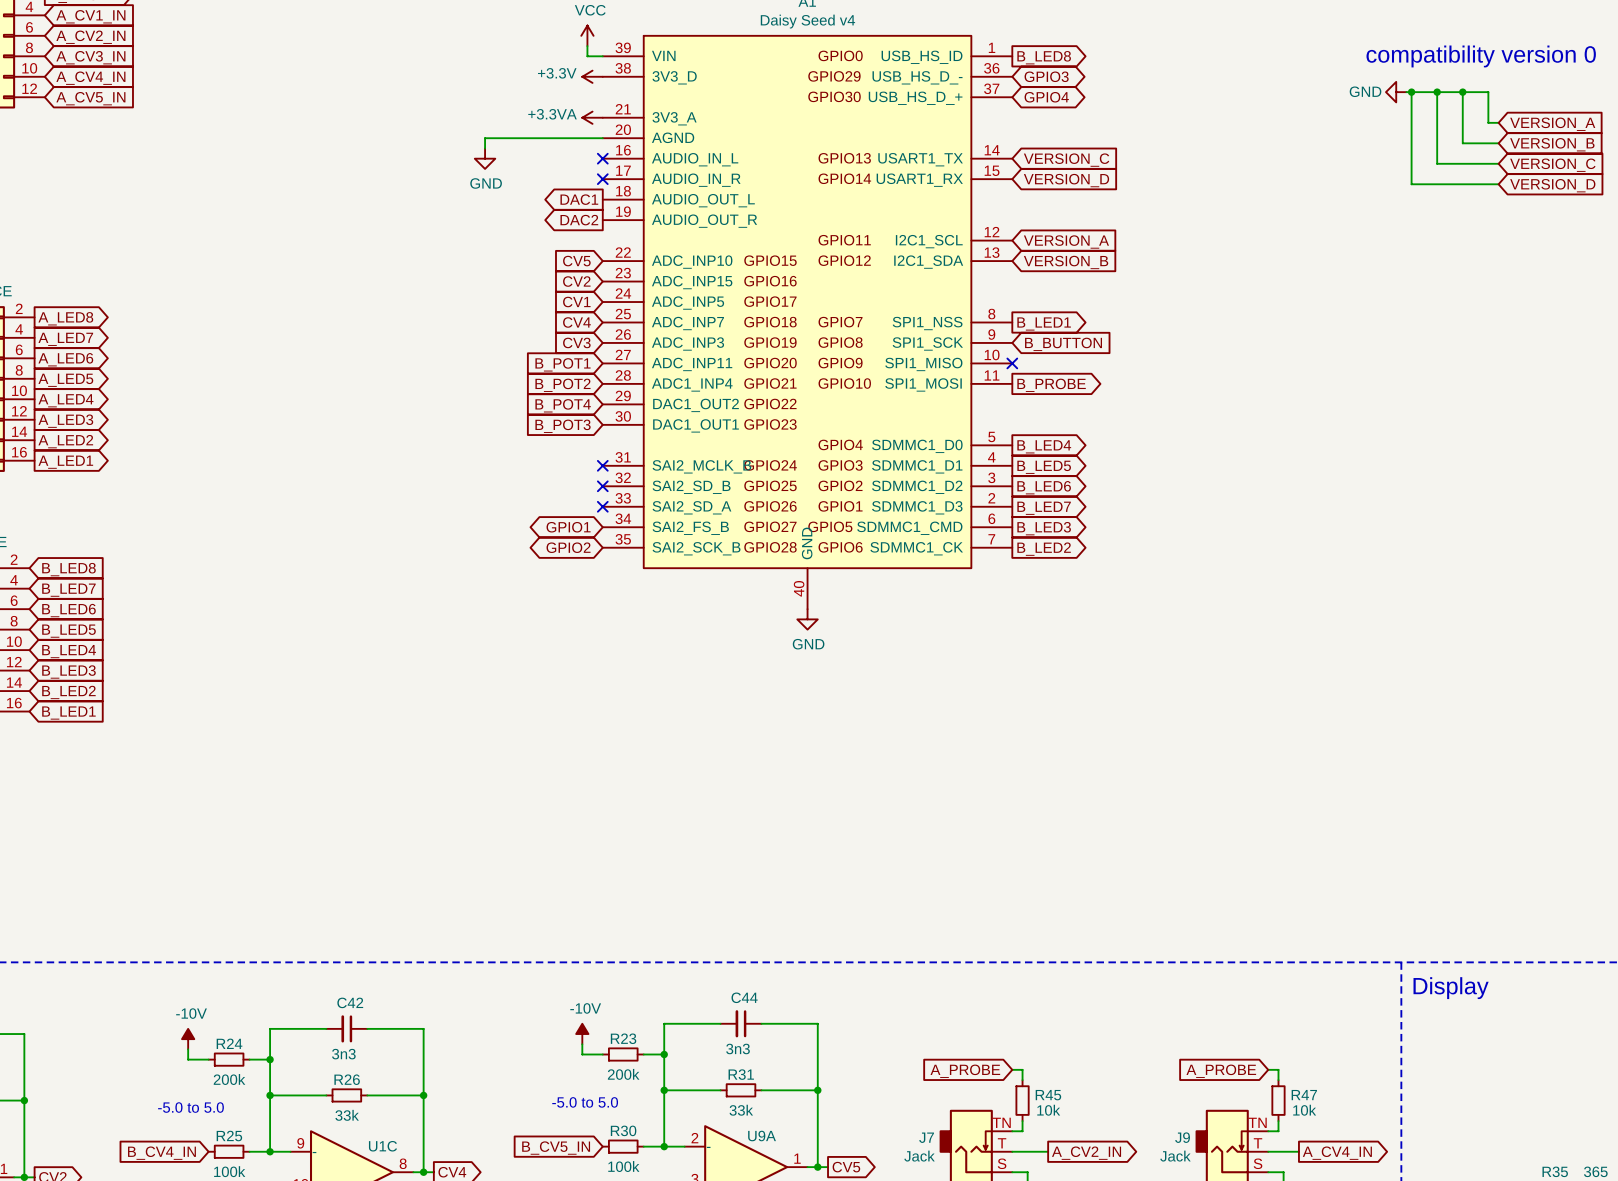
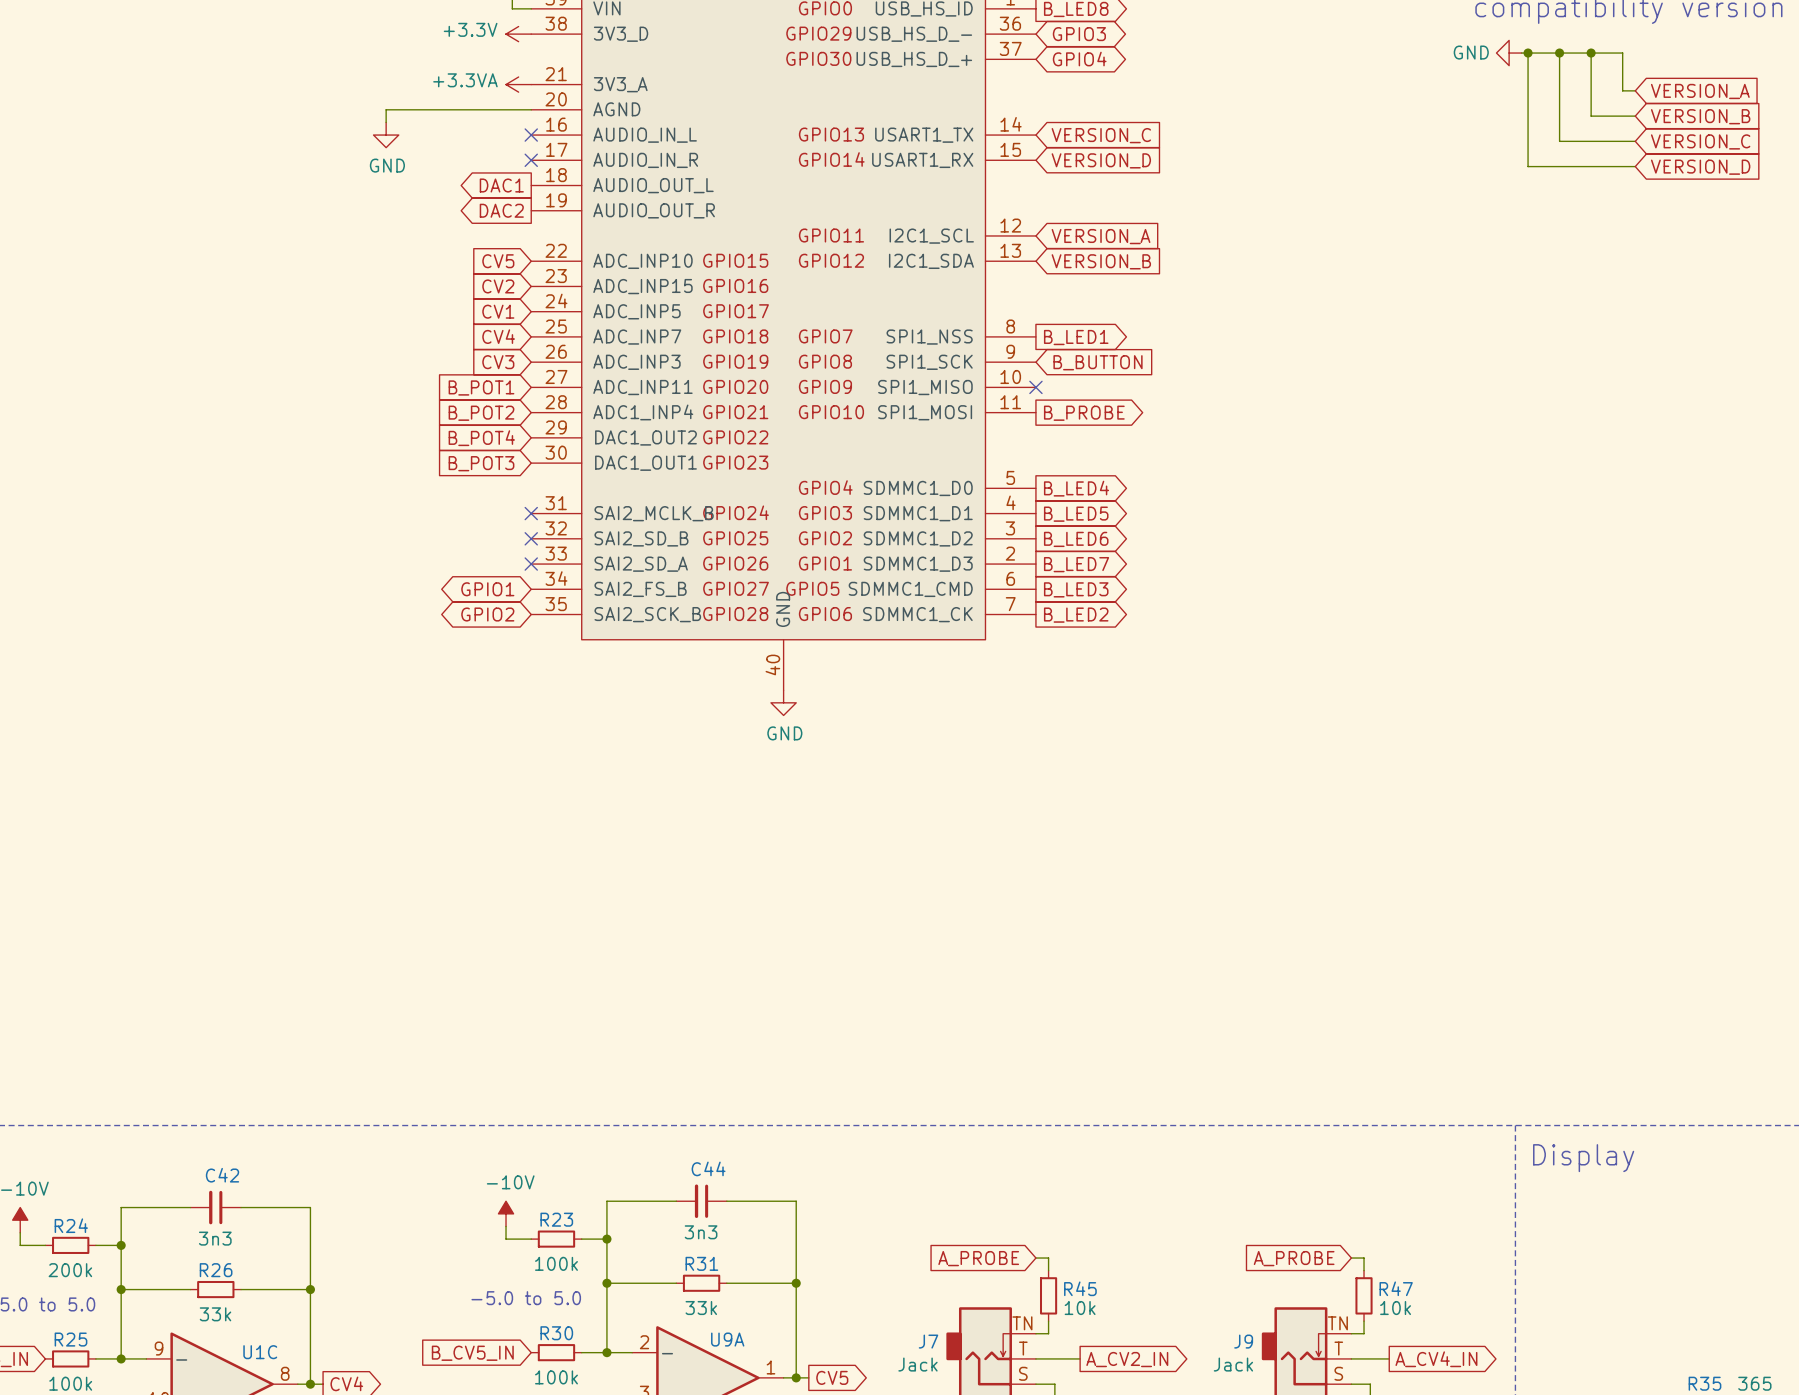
R23 value: 200k (623, 1074) -> 100k (556, 1263)

